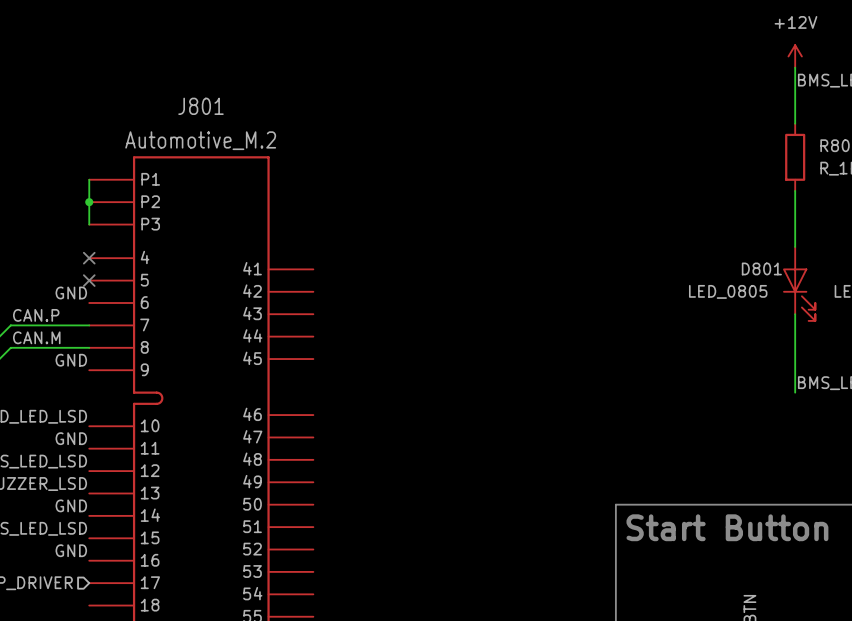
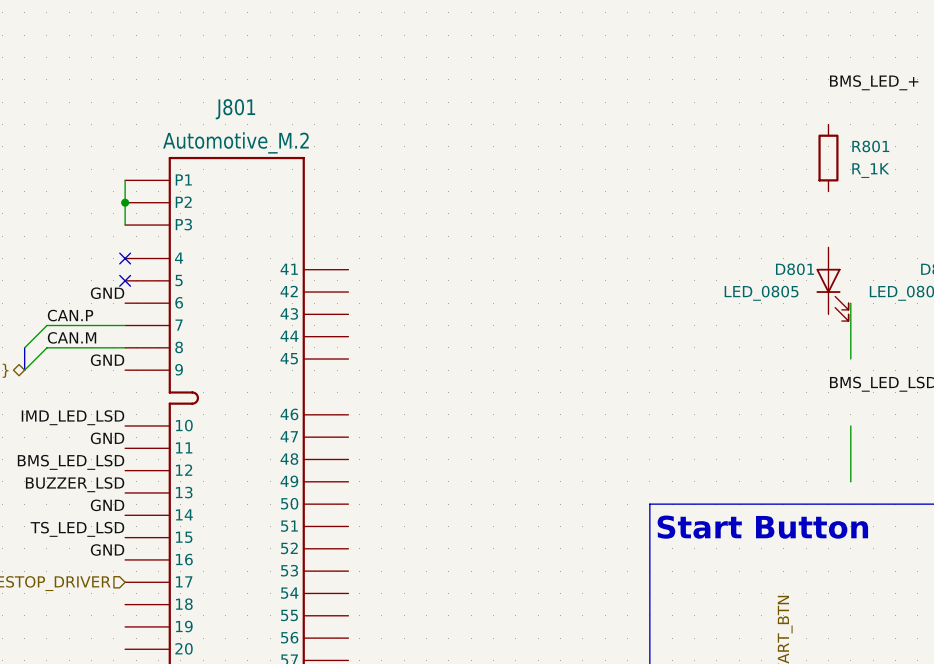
power symbol: +12V (795, 56) -> none
wire: (795, 67) (795, 123) -> none
wire: (795, 190) (795, 246) -> (850, 303) (850, 359)
wire: (795, 314) (795, 392) -> none
wire: none -> (850, 425) (850, 481)

